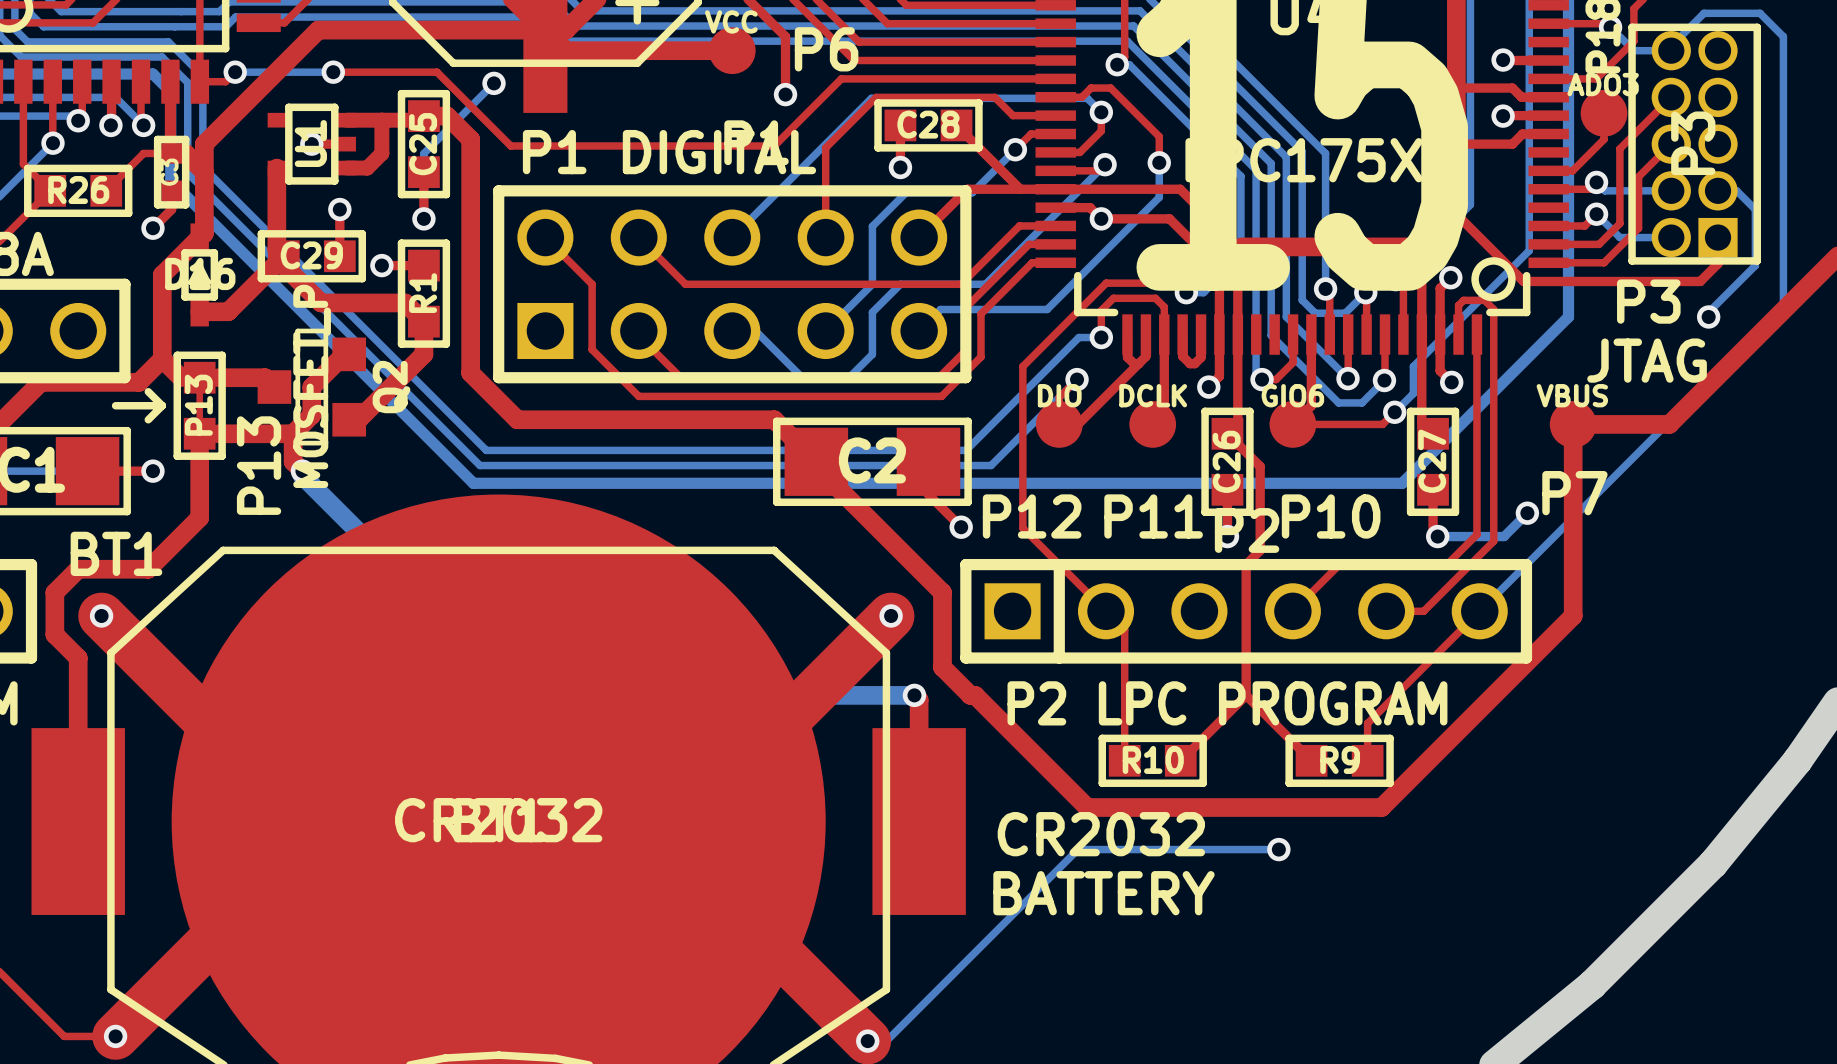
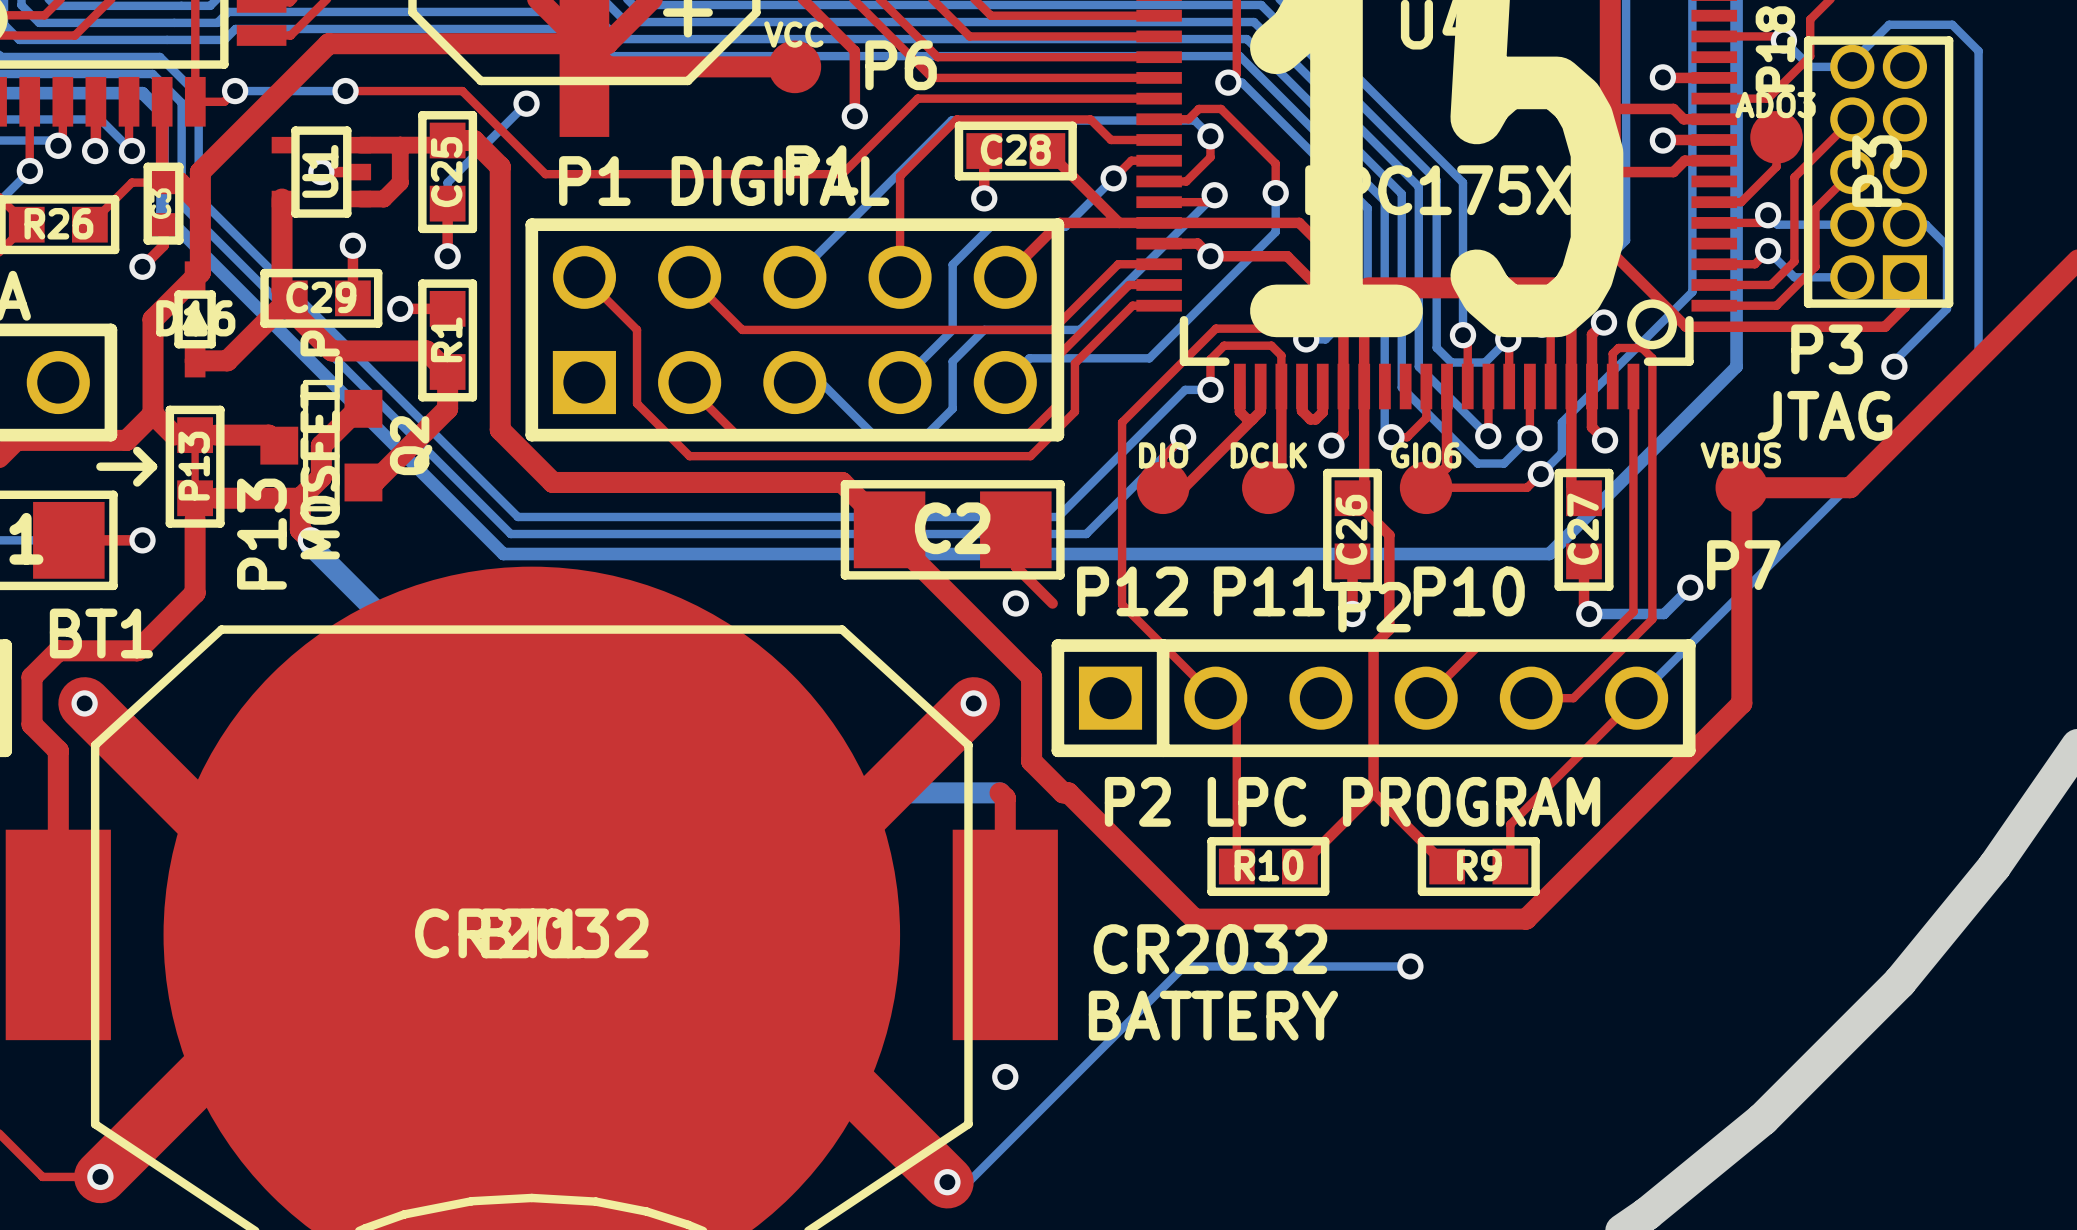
via position: (961, 527) -> (1015, 603)
via: (914, 695) -> none
via: none -> (1005, 1076)

